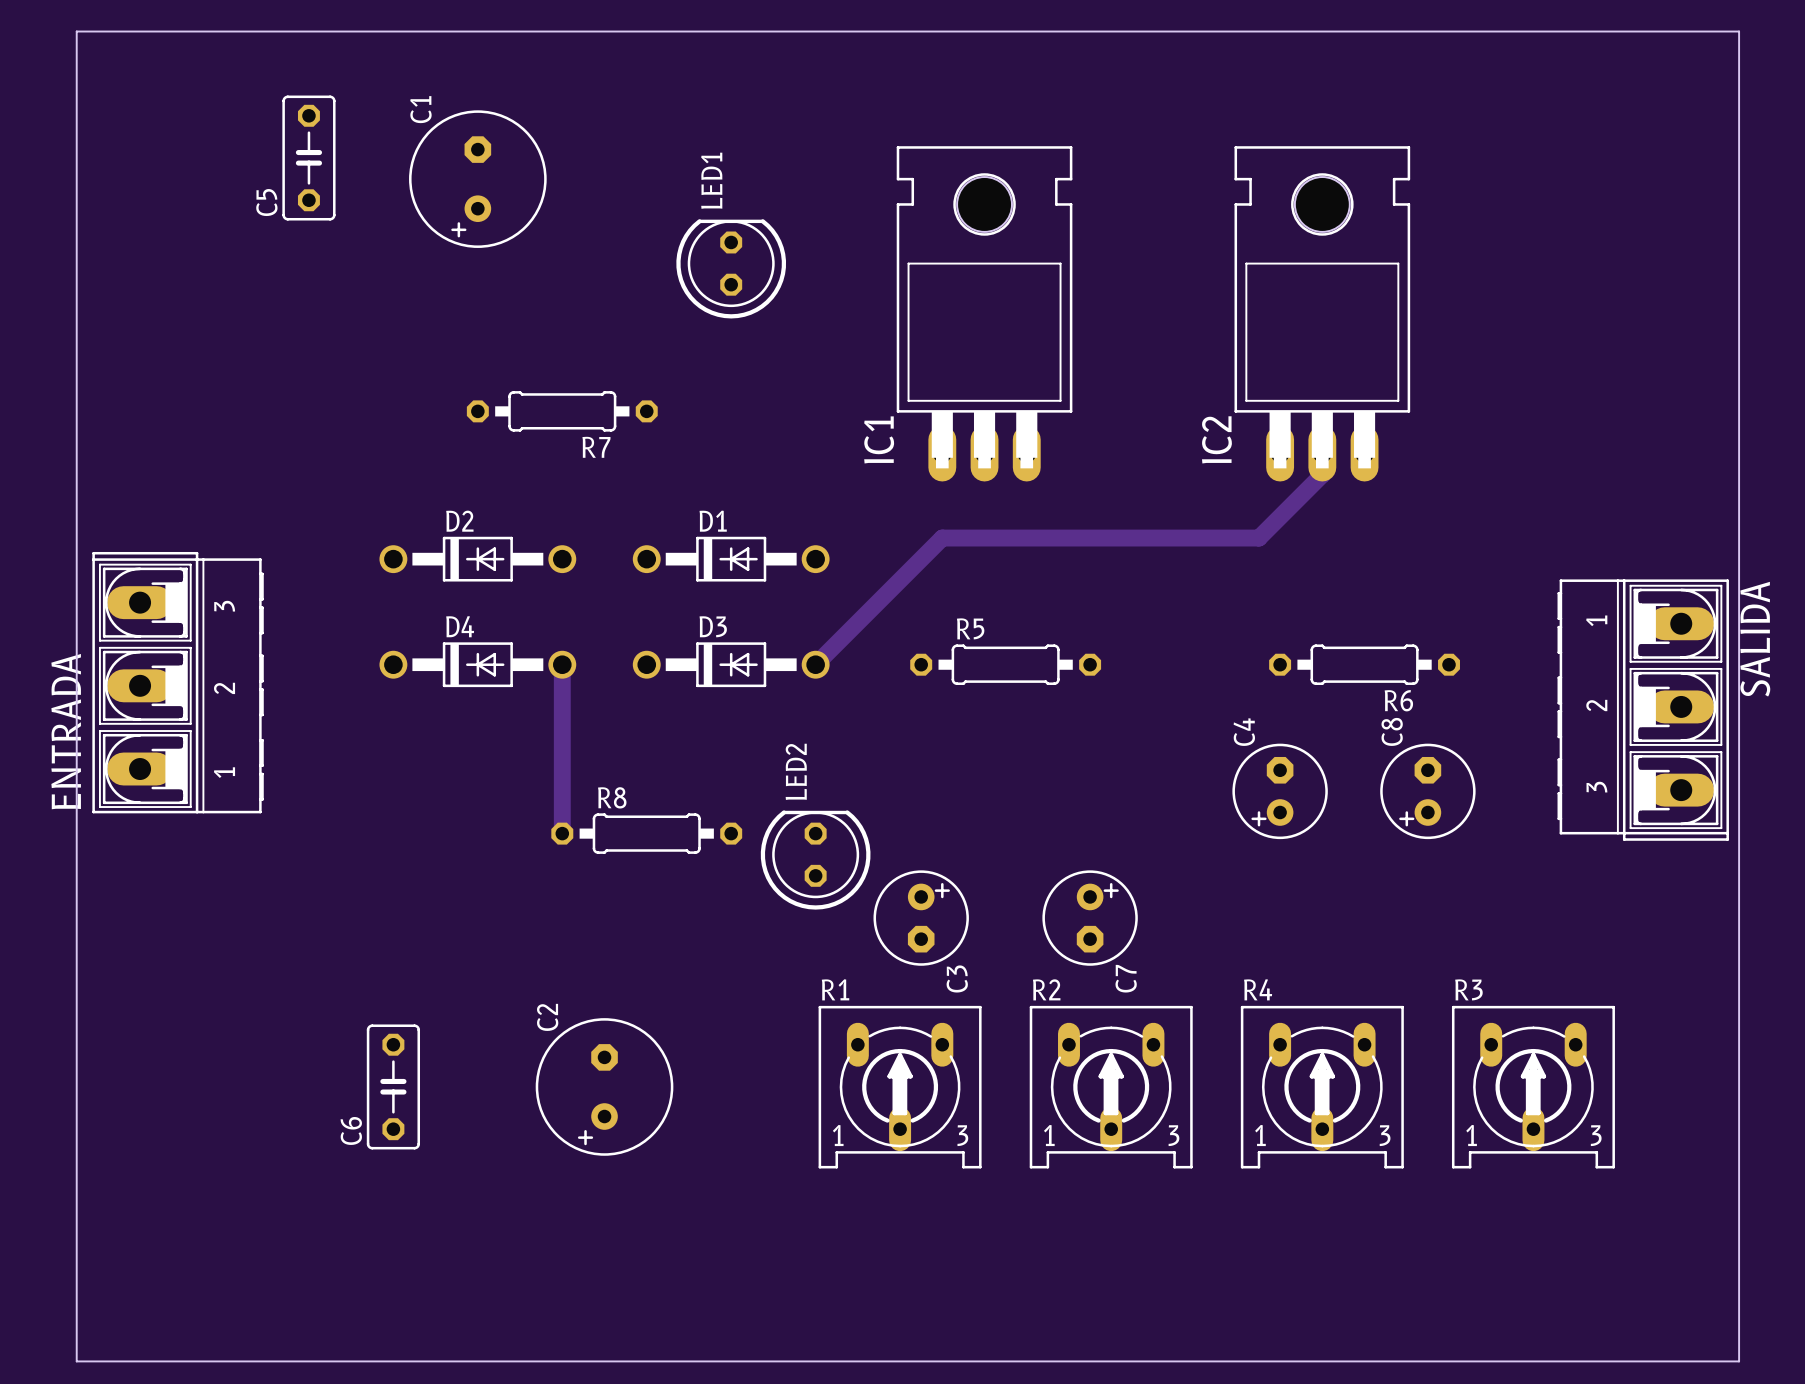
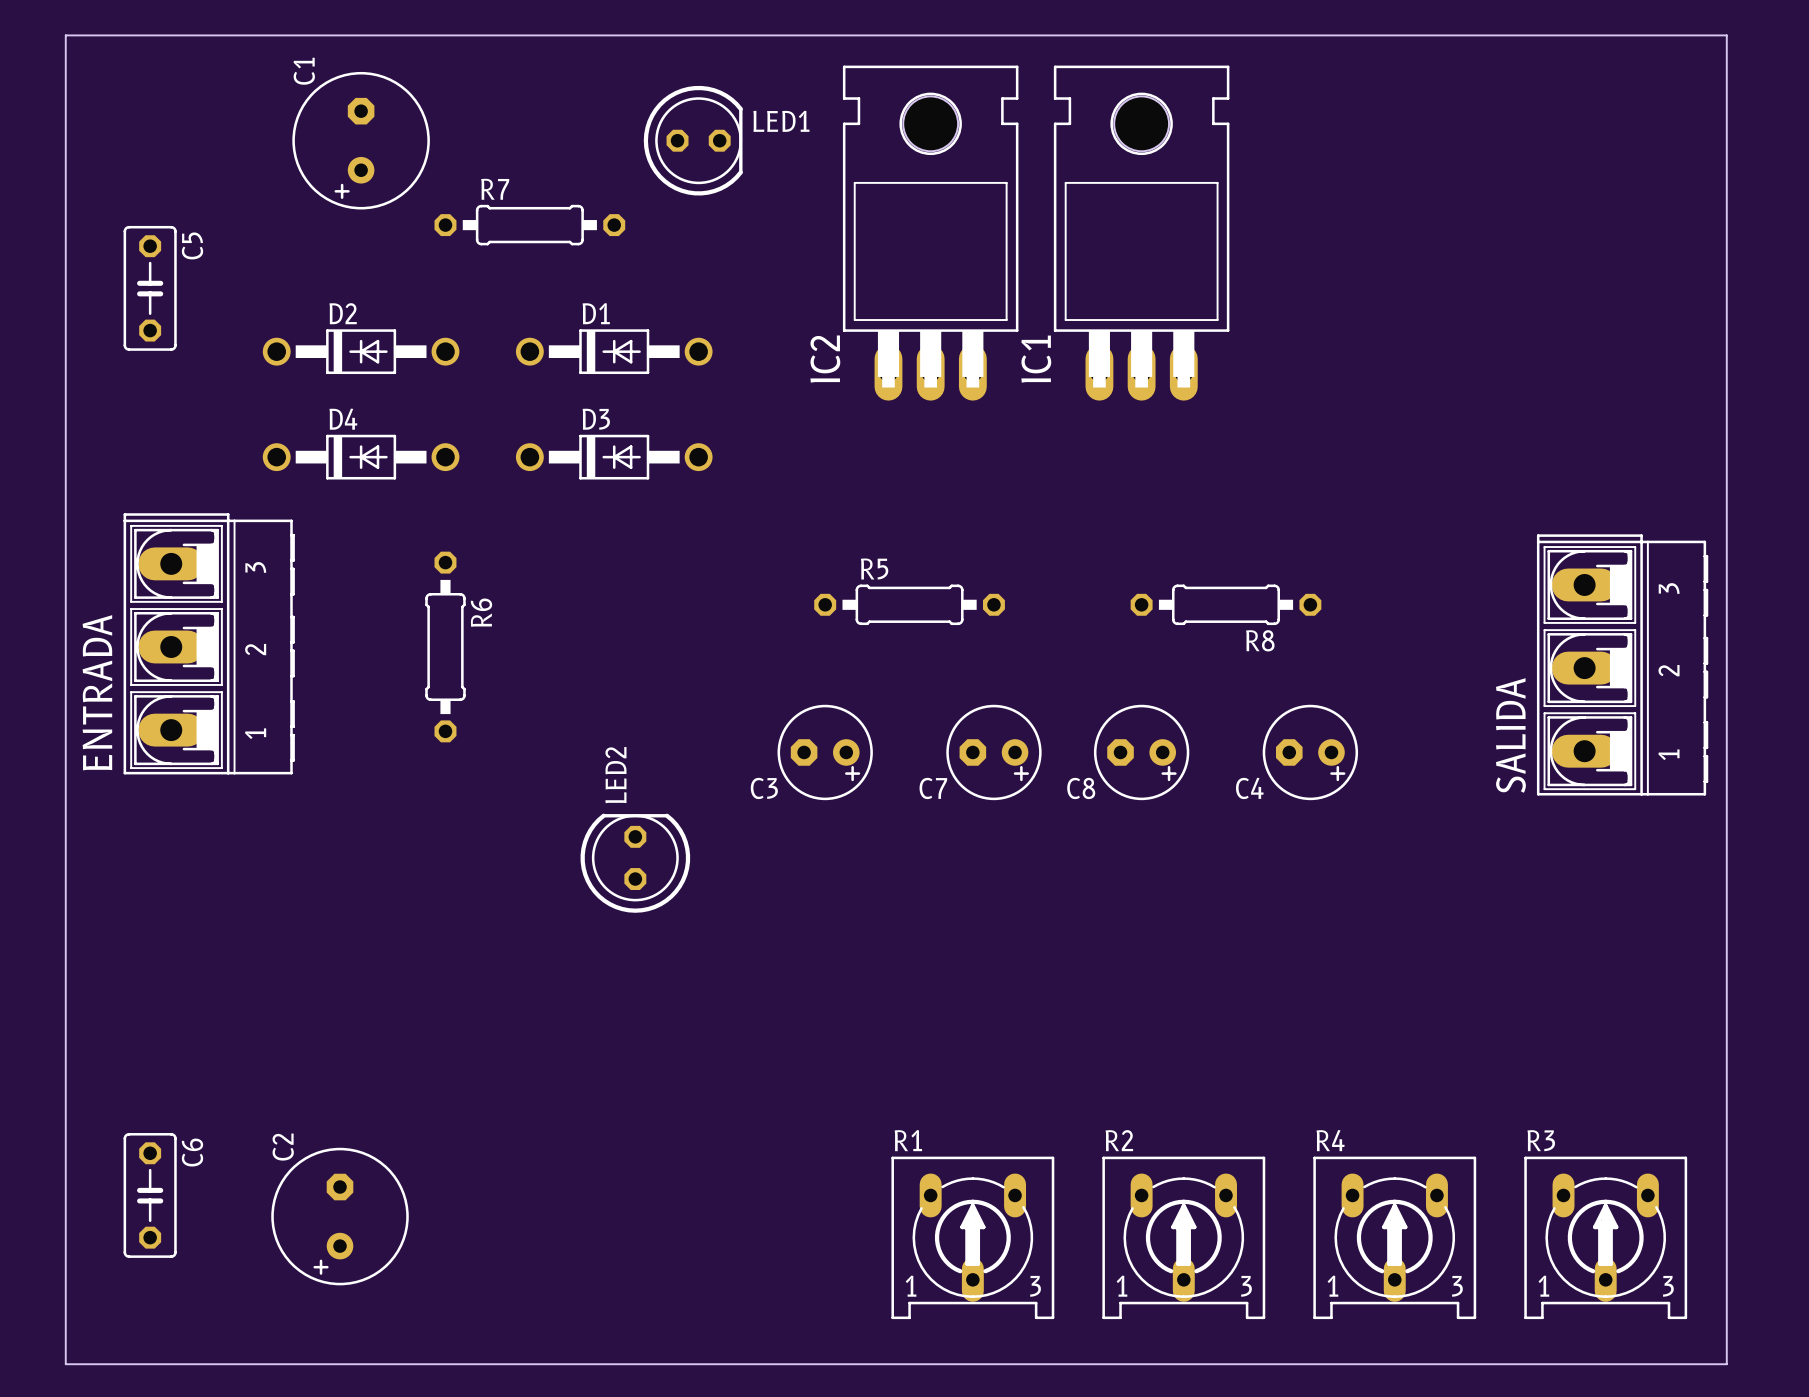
C5 rotation: 0° (308, 158) -> 180° (150, 288)
C5 position: (308, 158) -> (150, 288)
C1 position: (477, 179) -> (361, 140)
LED1 rotation: 0° (731, 268) -> 90° clockwise (693, 140)
LED1 position: (731, 268) -> (693, 140)
IC1 position: (984, 313) -> (1141, 233)
IC2 position: (1322, 313) -> (930, 233)
R7 position: (562, 411) -> (529, 225)
R7 name position: R7 (596, 447) -> R7 (495, 189)
track: (1322, 453) (1322, 474) (1259, 538) (942, 538) (815, 664) -> none
D2 position: (477, 559) -> (361, 351)
D1 position: (731, 559) -> (614, 351)
SALIDA: none -> (1622, 664)
D4 position: (477, 664) -> (361, 457)
track: (562, 664) (562, 833) -> none
D3 position: (731, 664) -> (614, 457)
R5 position: (1005, 664) -> (909, 604)
R6 rotation: 0° (1364, 664) -> 90° clockwise (445, 646)
R6 position: (1364, 664) -> (445, 646)
ENTRADA position: (178, 682) -> (209, 643)
R6 name position: R6 (1398, 700) -> R6 (481, 612)
SALIDA: (1643, 710) -> none
C4 rotation: 0° (1280, 791) -> 90° counterclockwise (1310, 752)
C4 position: (1280, 791) -> (1310, 752)
C8 rotation: 0° (1427, 791) -> 90° counterclockwise (1141, 752)
C8 position: (1427, 791) -> (1141, 752)
R8 name position: R8 (612, 797) -> R8 (1260, 640)
R8 position: (646, 833) -> (1226, 604)
LED2 position: (815, 860) -> (635, 863)
C3 rotation: 0° (921, 918) -> 90° clockwise (825, 752)
C3 position: (921, 918) -> (825, 752)
C7 rotation: 0° (1090, 918) -> 90° clockwise (993, 752)
C7 position: (1090, 918) -> (993, 752)
C6 rotation: 0° (393, 1086) -> 180° (150, 1195)
C6 position: (393, 1086) -> (150, 1195)
C2 position: (604, 1086) -> (340, 1216)
R1 position: (900, 1087) -> (972, 1237)
R2 position: (1111, 1087) -> (1183, 1237)
R4 position: (1322, 1087) -> (1394, 1237)
R3 position: (1533, 1087) -> (1605, 1237)

